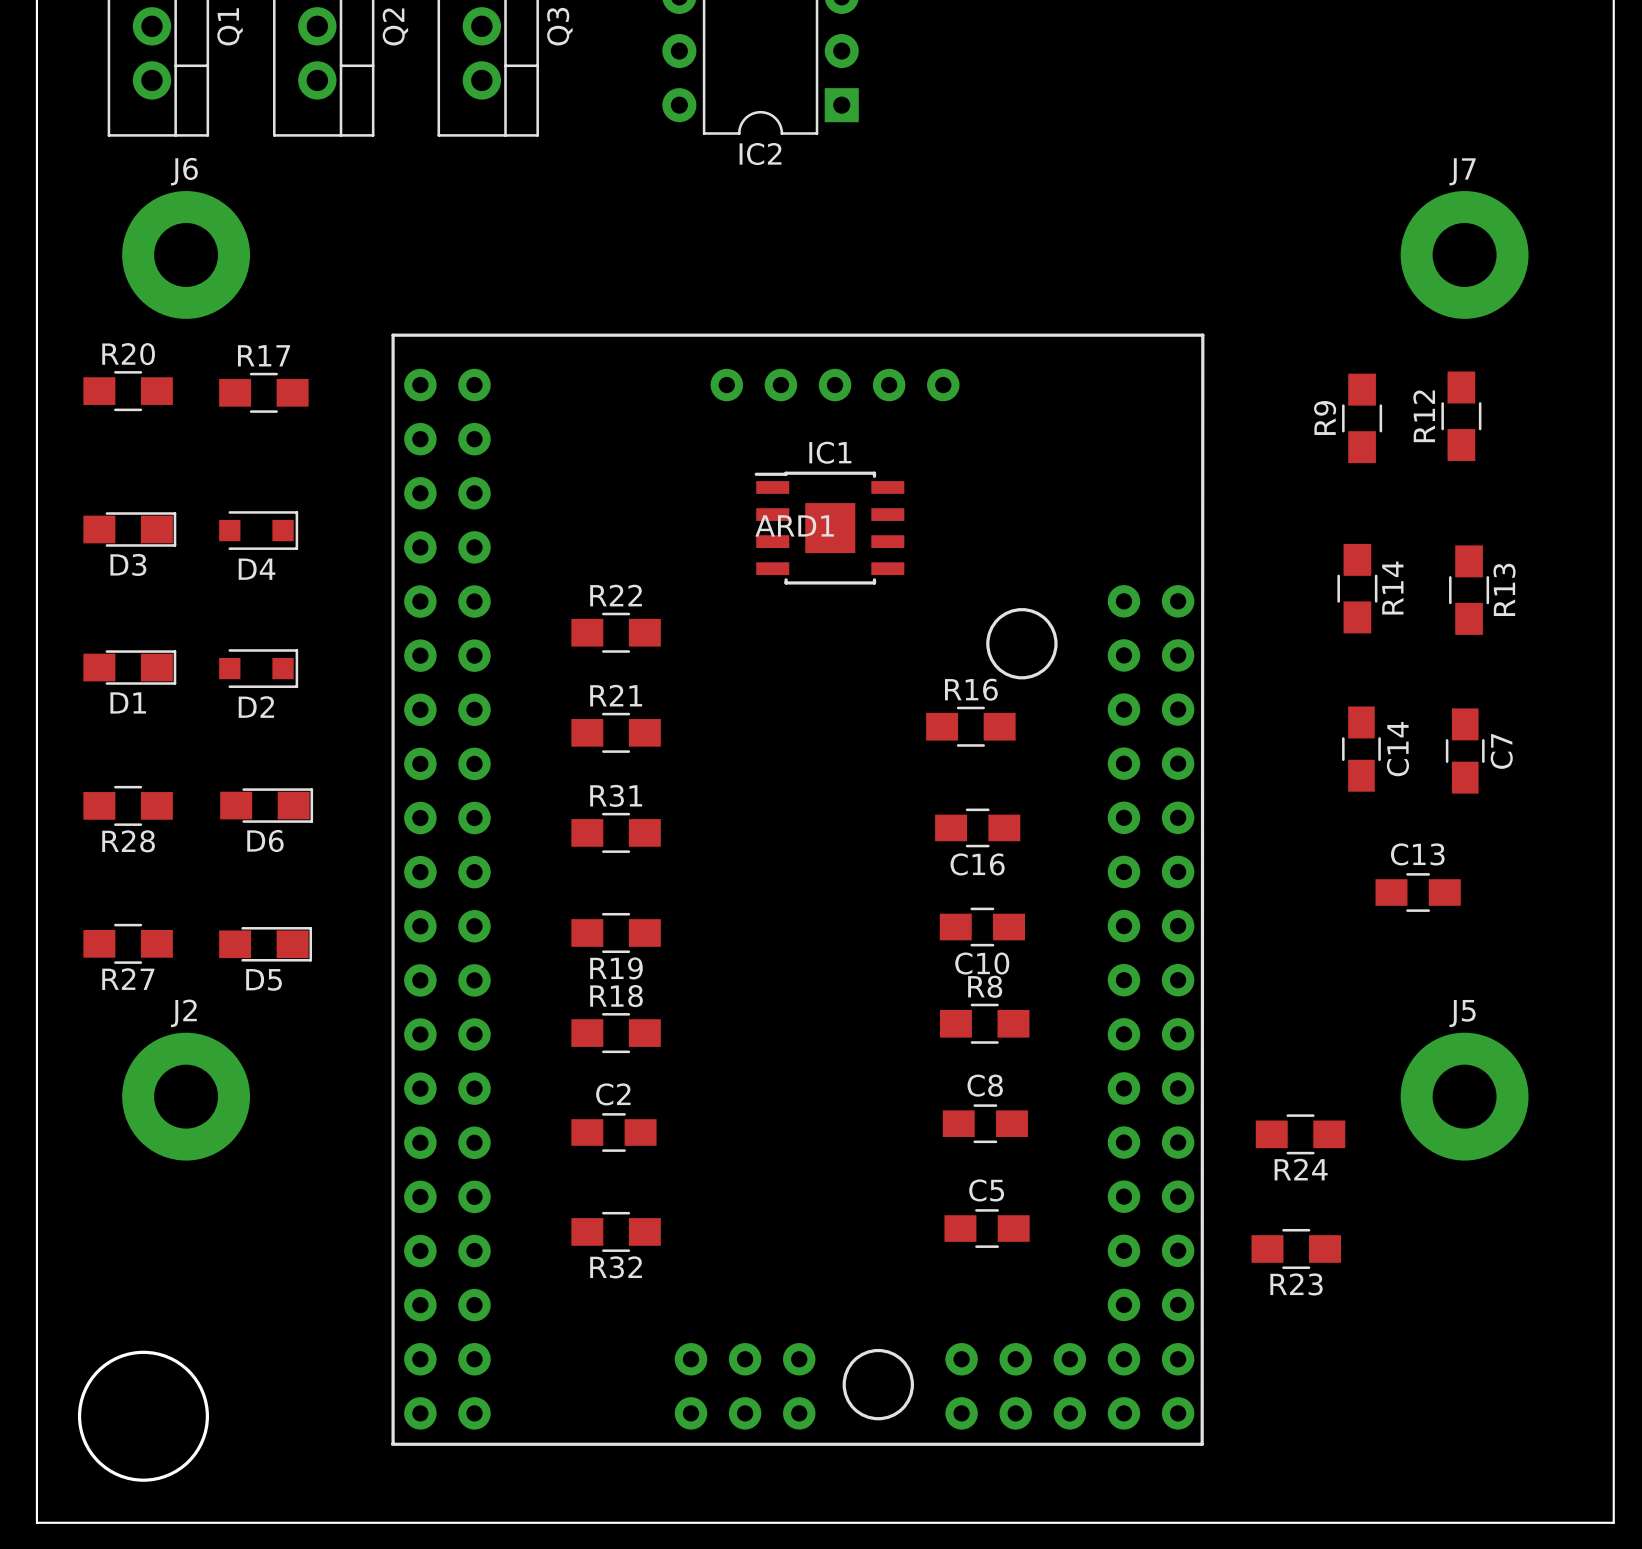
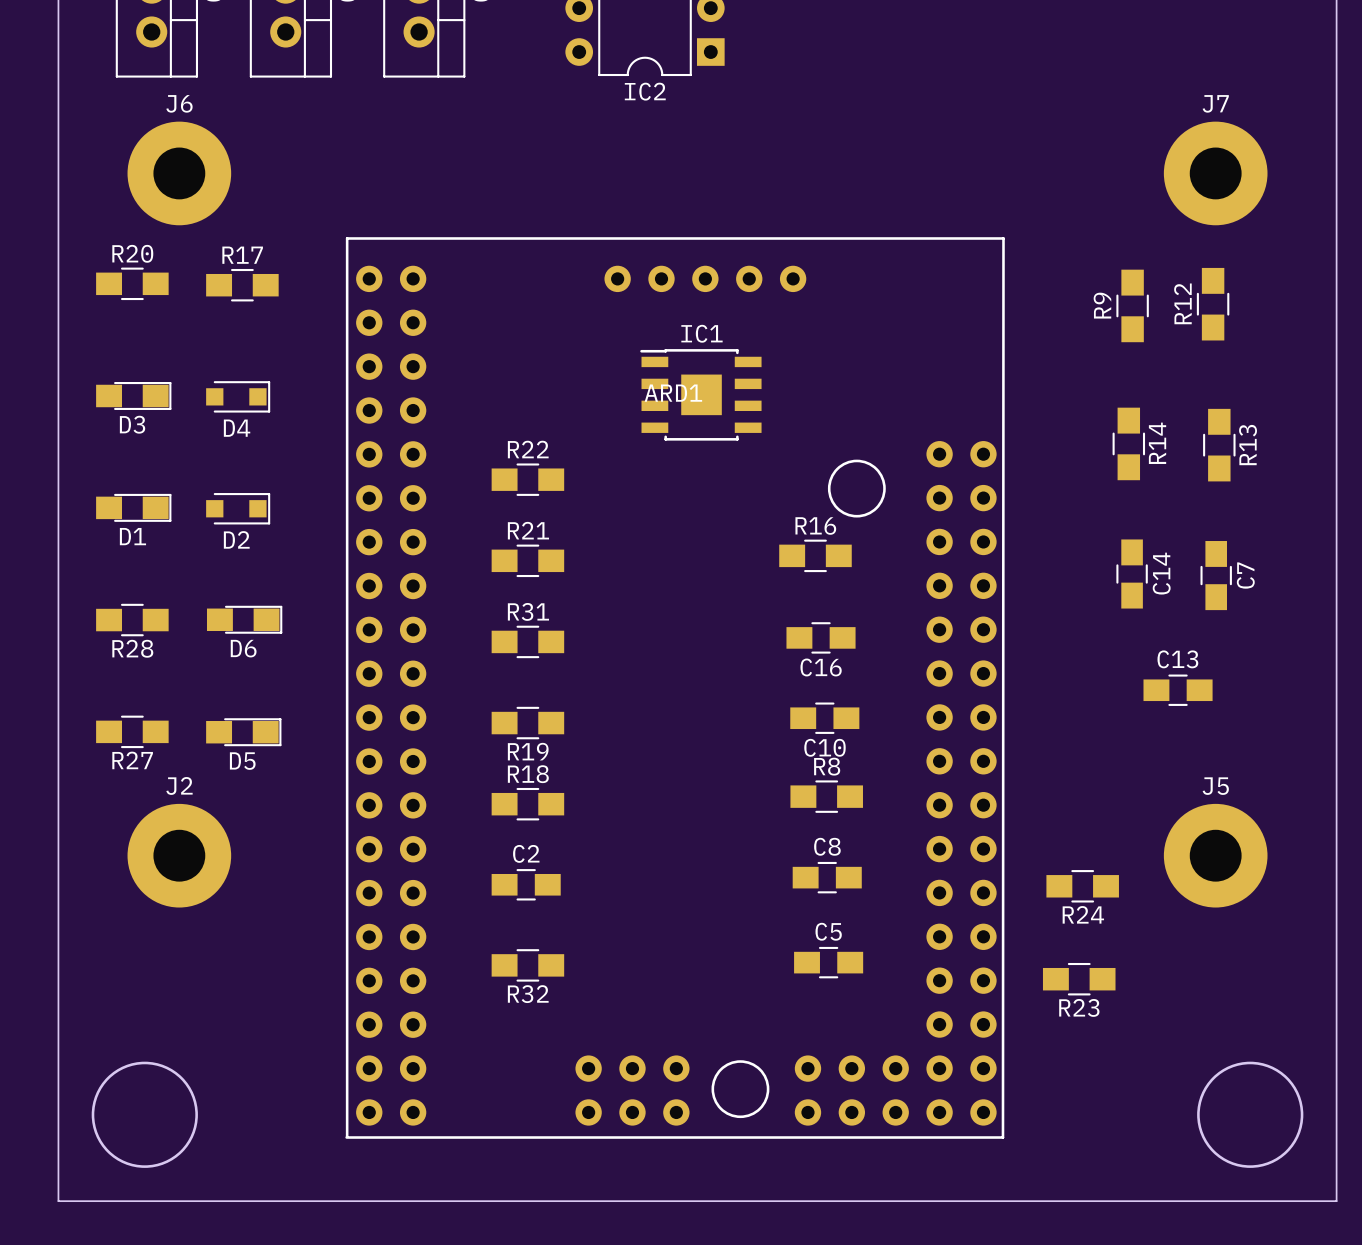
round board edge: none -> [1197, 1061, 1304, 1168]

